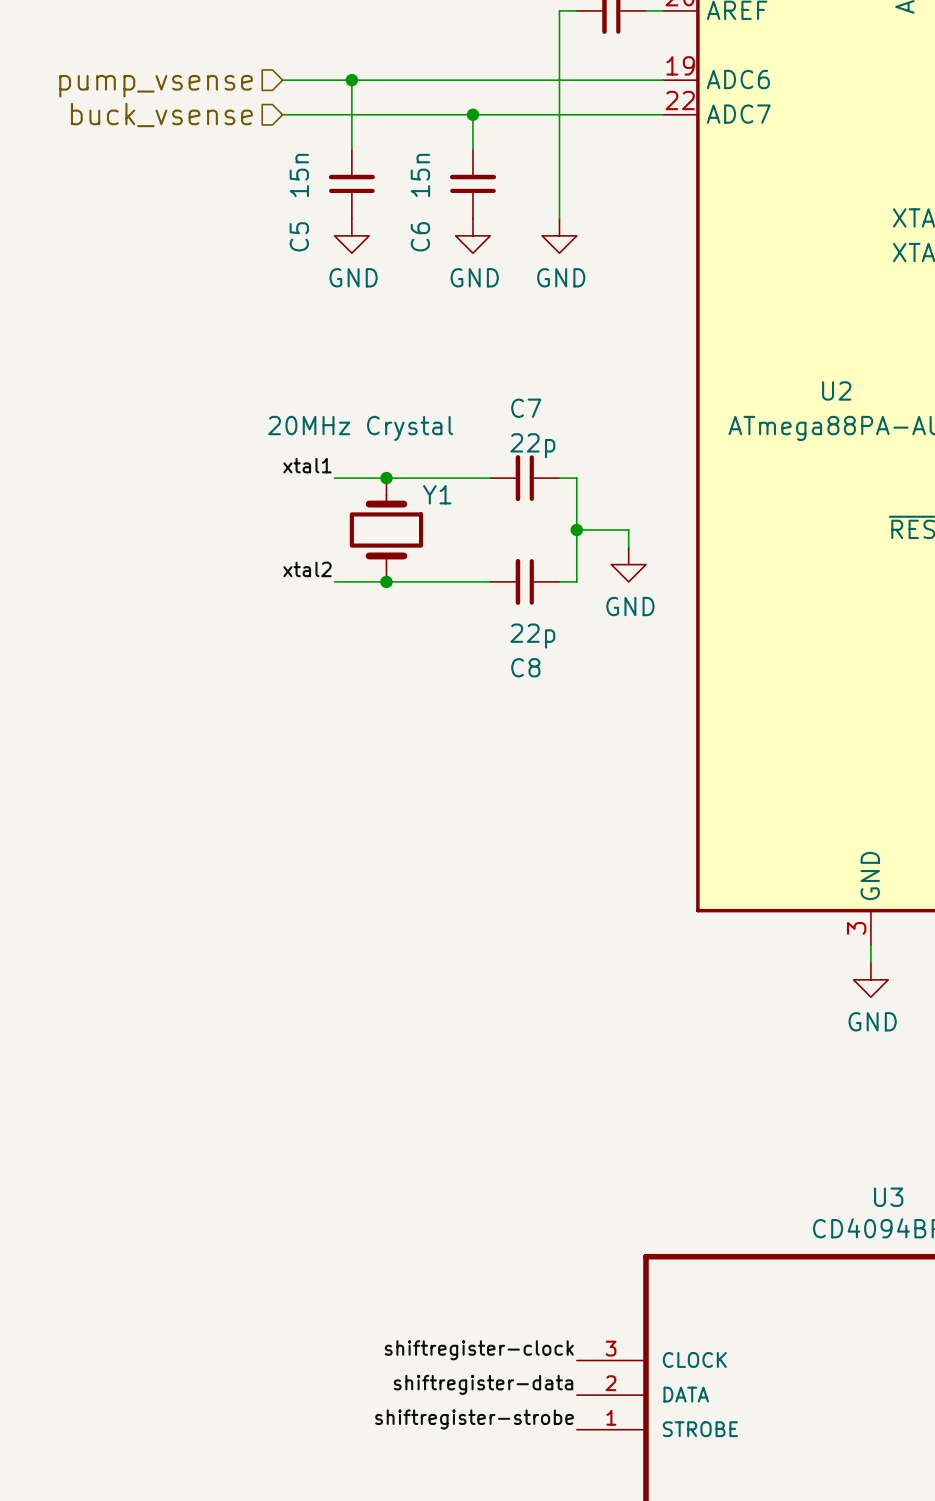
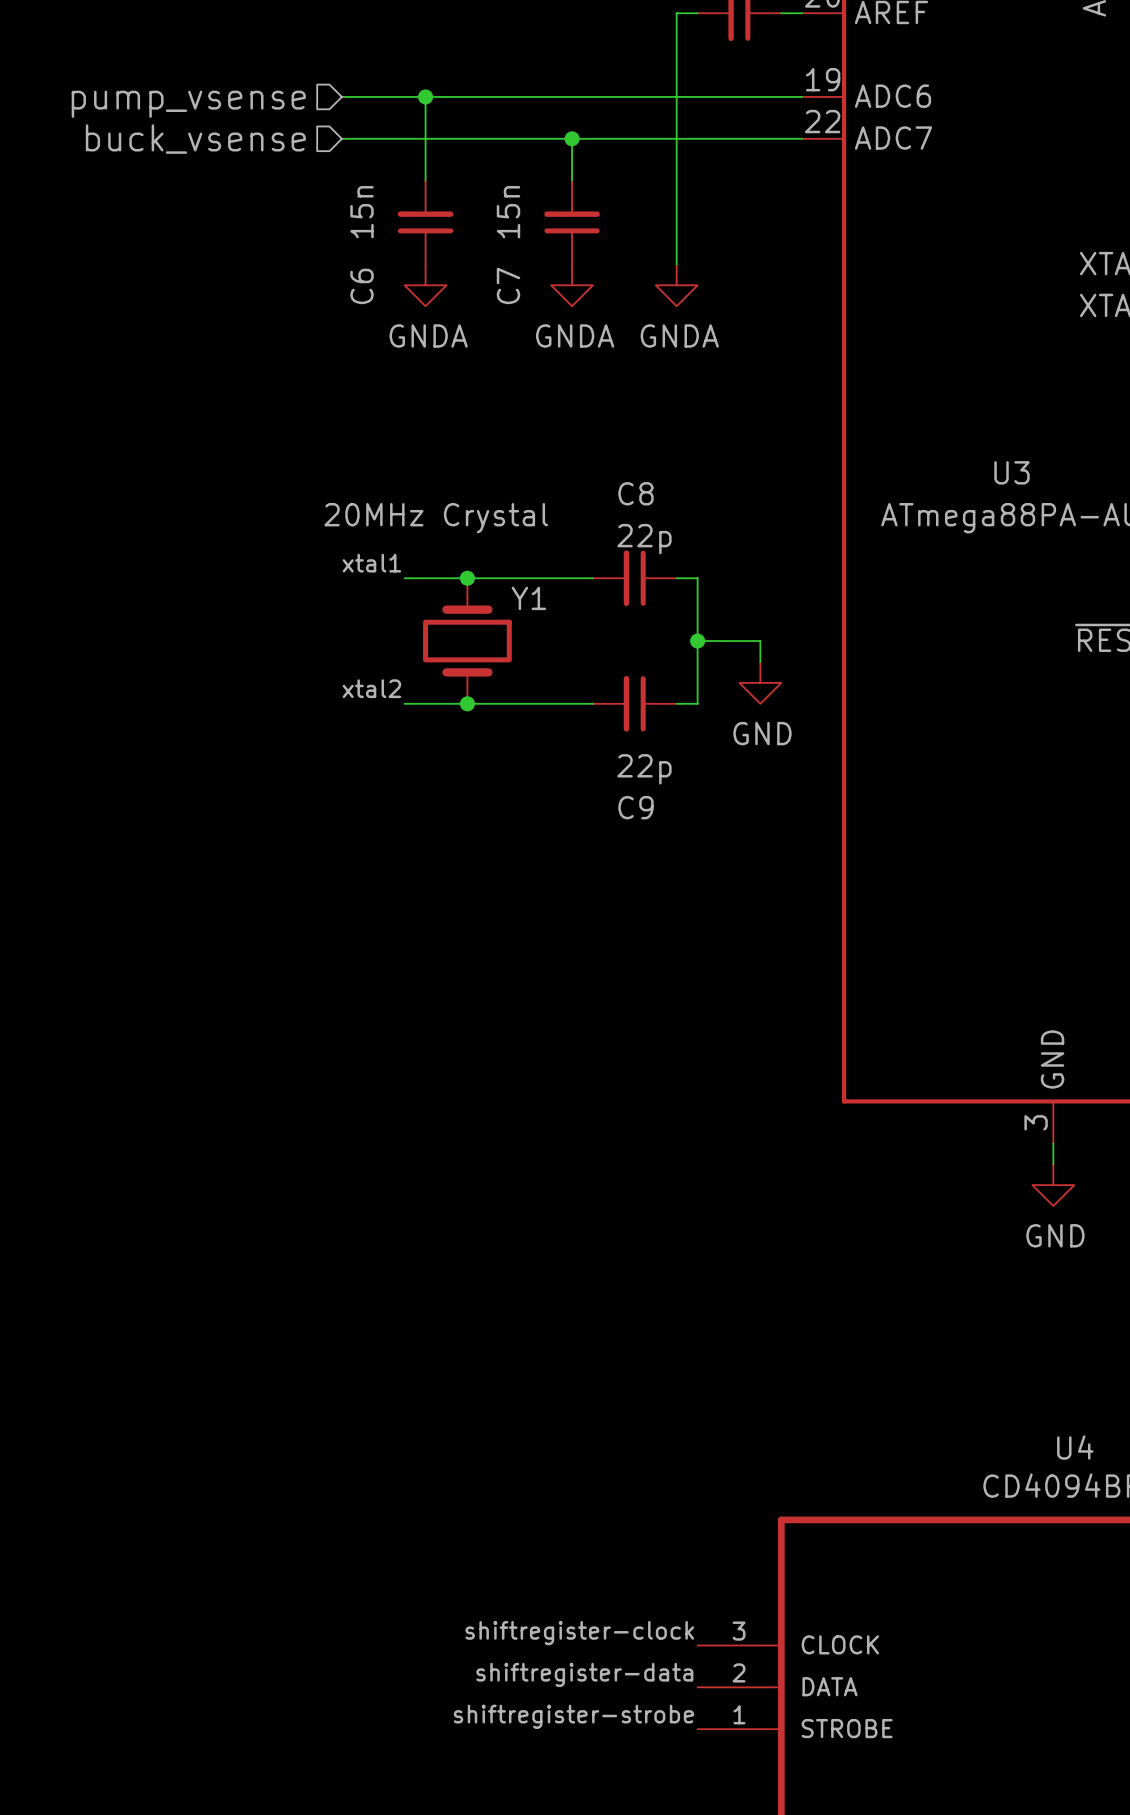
power symbol: GND (351, 235) -> GNDA (425, 285)
power symbol: GND (472, 235) -> GNDA (572, 285)
power symbol: GND (559, 235) -> GNDA (676, 285)
C5 name: C5 (299, 236) -> C6 (362, 286)
C6 name: C6 (420, 236) -> C7 (508, 285)
U2 name: U2 (836, 390) -> U3 (1011, 472)
C7 name: C7 (526, 408) -> C8 (635, 493)
C8 name: C8 (525, 667) -> C9 (635, 807)
U3 name: U3 (888, 1197) -> U4 (1075, 1447)

